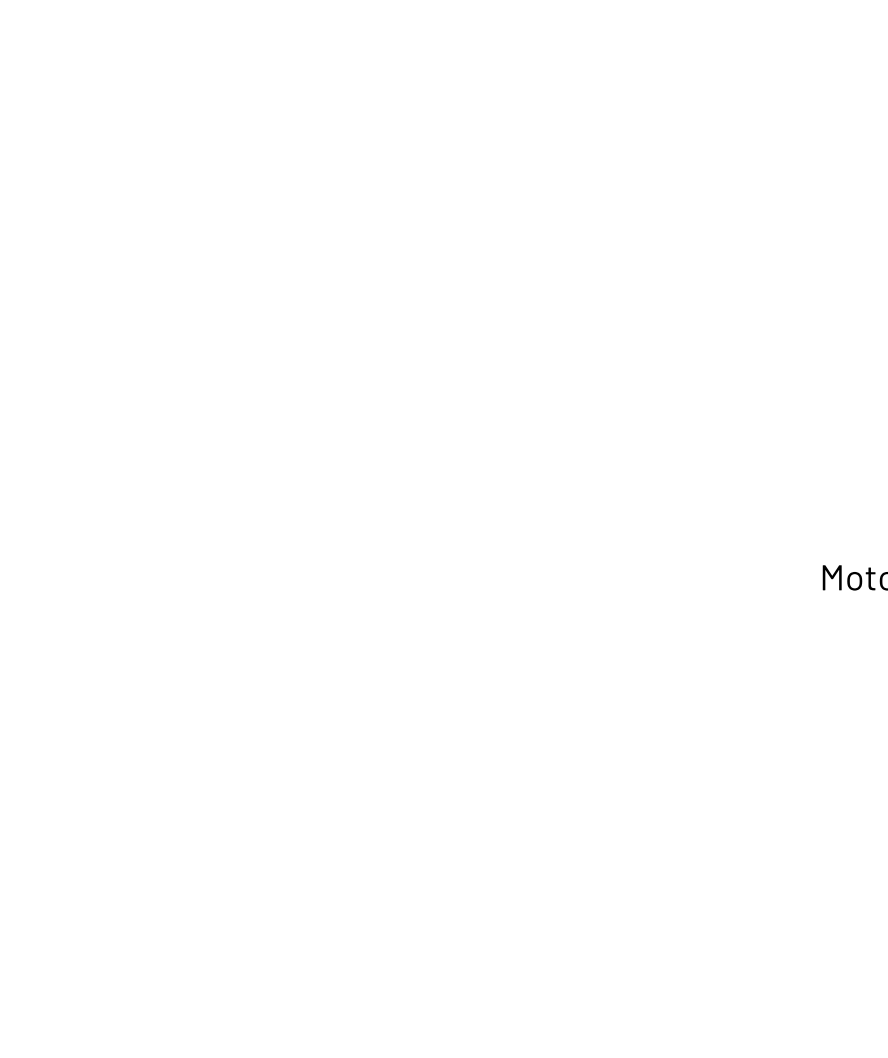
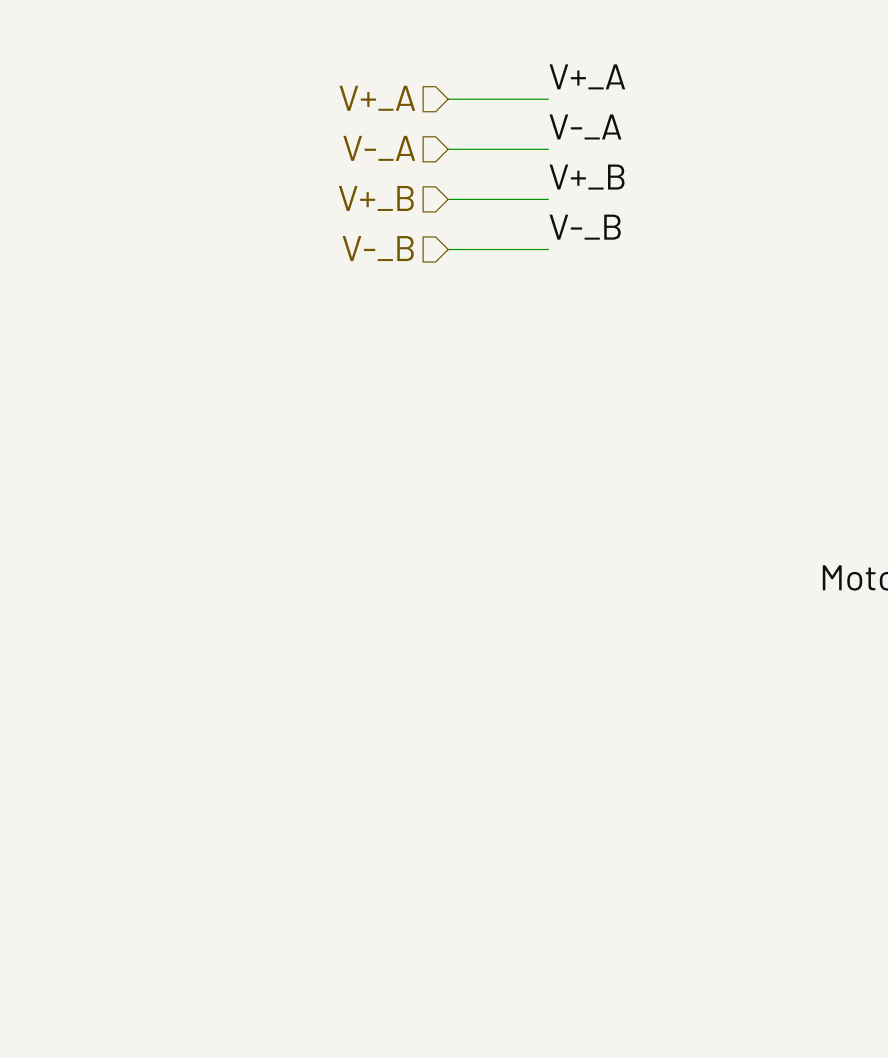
label: none -> V+_A (587, 76)
hierarchical label: none -> V+_A (377, 98)
wire: none -> (448, 99) (548, 99)
label: none -> V-_A (585, 126)
hierarchical label: none -> V-_A (379, 148)
wire: none -> (448, 149) (548, 149)
label: none -> V+_B (587, 177)
hierarchical label: none -> V+_B (376, 198)
wire: none -> (448, 199) (548, 199)
label: none -> V-_B (585, 227)
hierarchical label: none -> V-_B (378, 248)
wire: none -> (448, 249) (548, 249)

